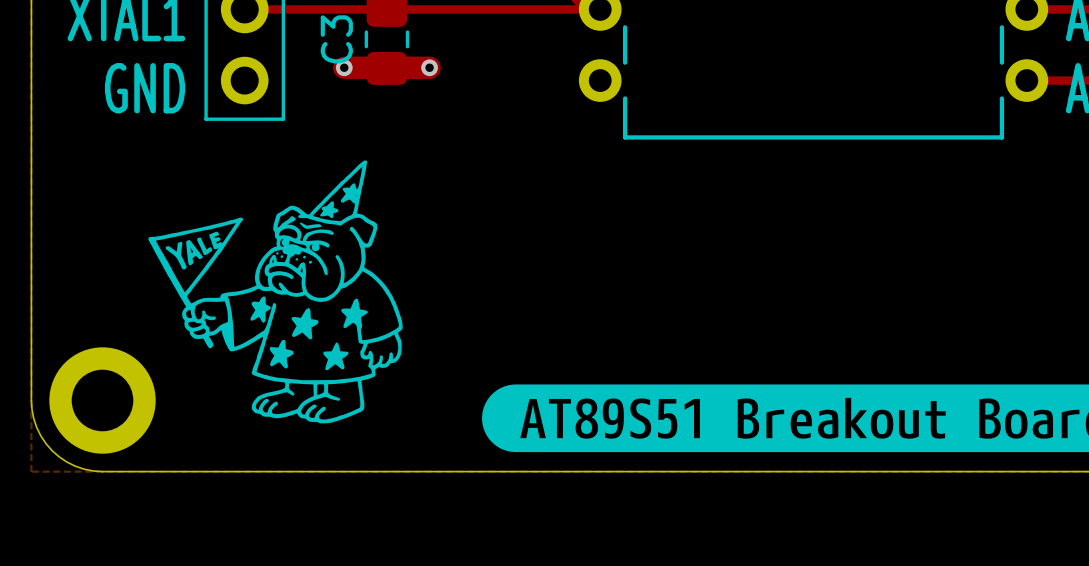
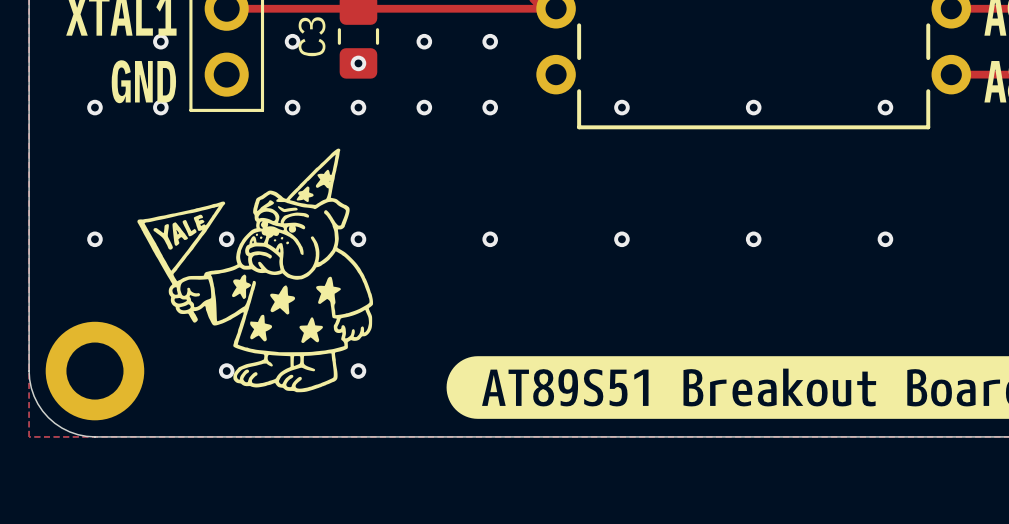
via: none -> (160, 41)
via: none -> (292, 41)
via: none -> (424, 41)
via: none -> (490, 41)
top track: (344, 67) (429, 67) -> none
via: (344, 67) -> none
via: (429, 67) -> none
via: none -> (358, 63)
via: none -> (94, 107)
via: none -> (160, 107)
via: none -> (292, 107)
via: none -> (358, 107)
via: none -> (424, 107)
via: none -> (490, 107)
via: none -> (621, 107)
via: none -> (753, 107)
via: none -> (885, 107)
via: none -> (94, 239)
via: none -> (226, 239)
via: none -> (358, 239)
via: none -> (490, 239)
via: none -> (621, 239)
via: none -> (753, 239)
via: none -> (885, 239)
via: none -> (226, 371)
via: none -> (358, 371)

